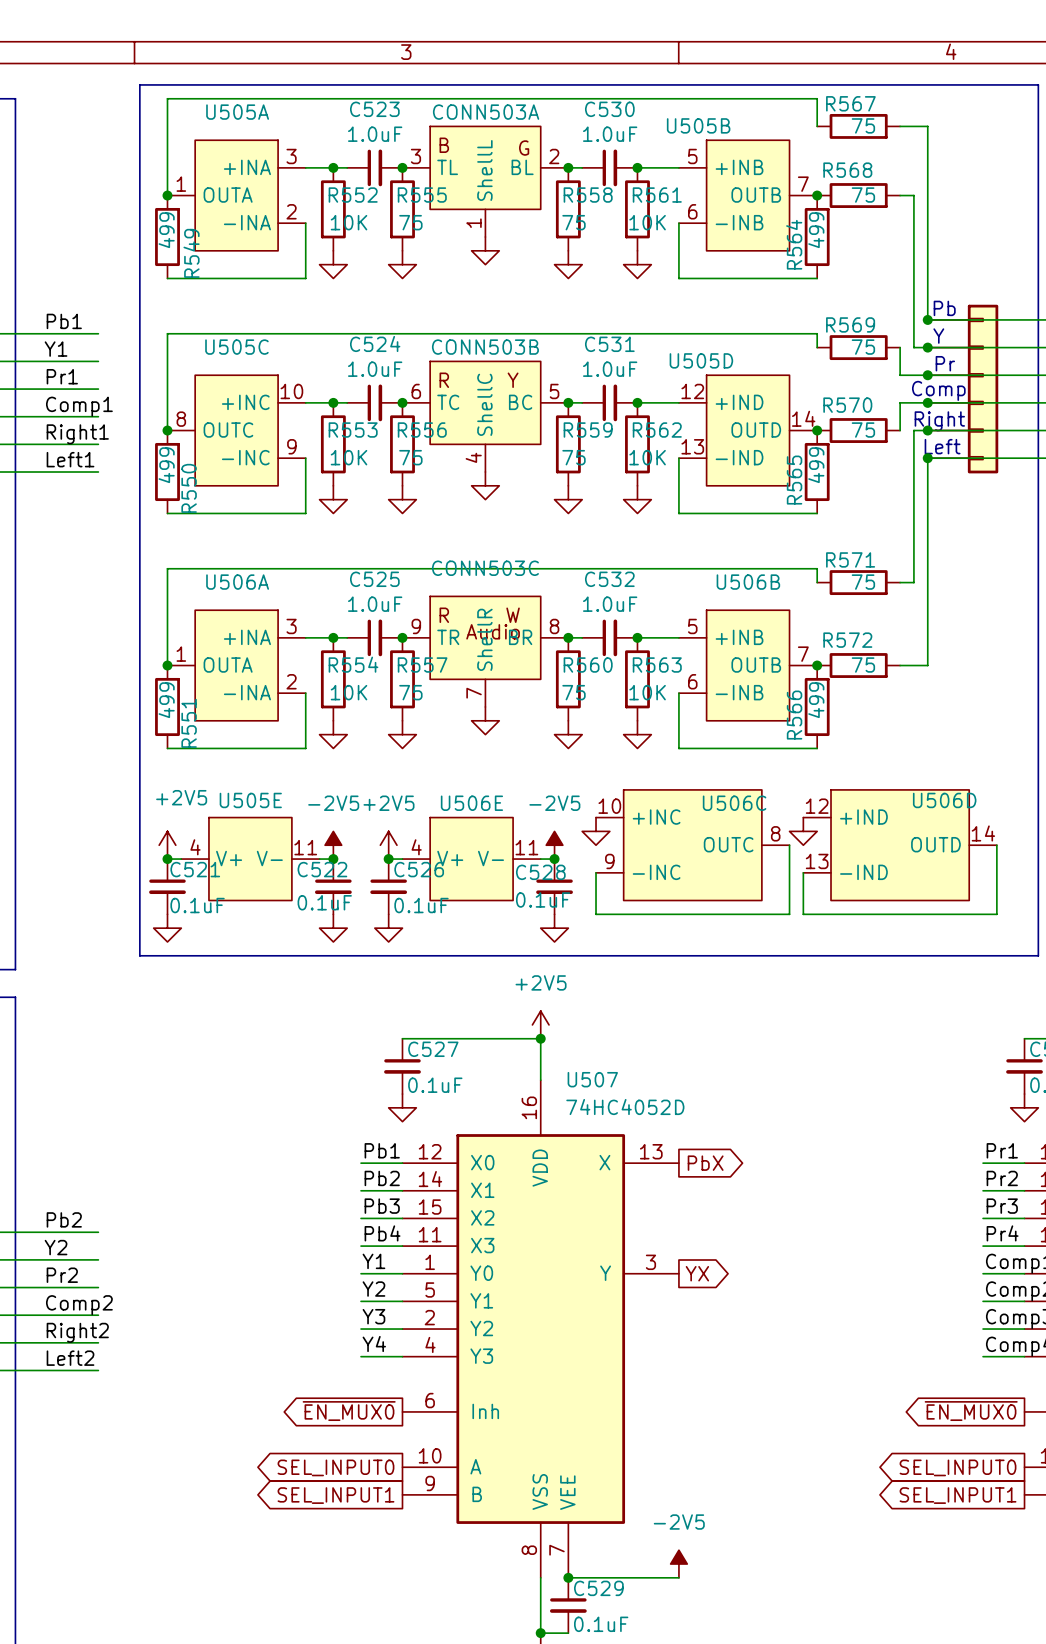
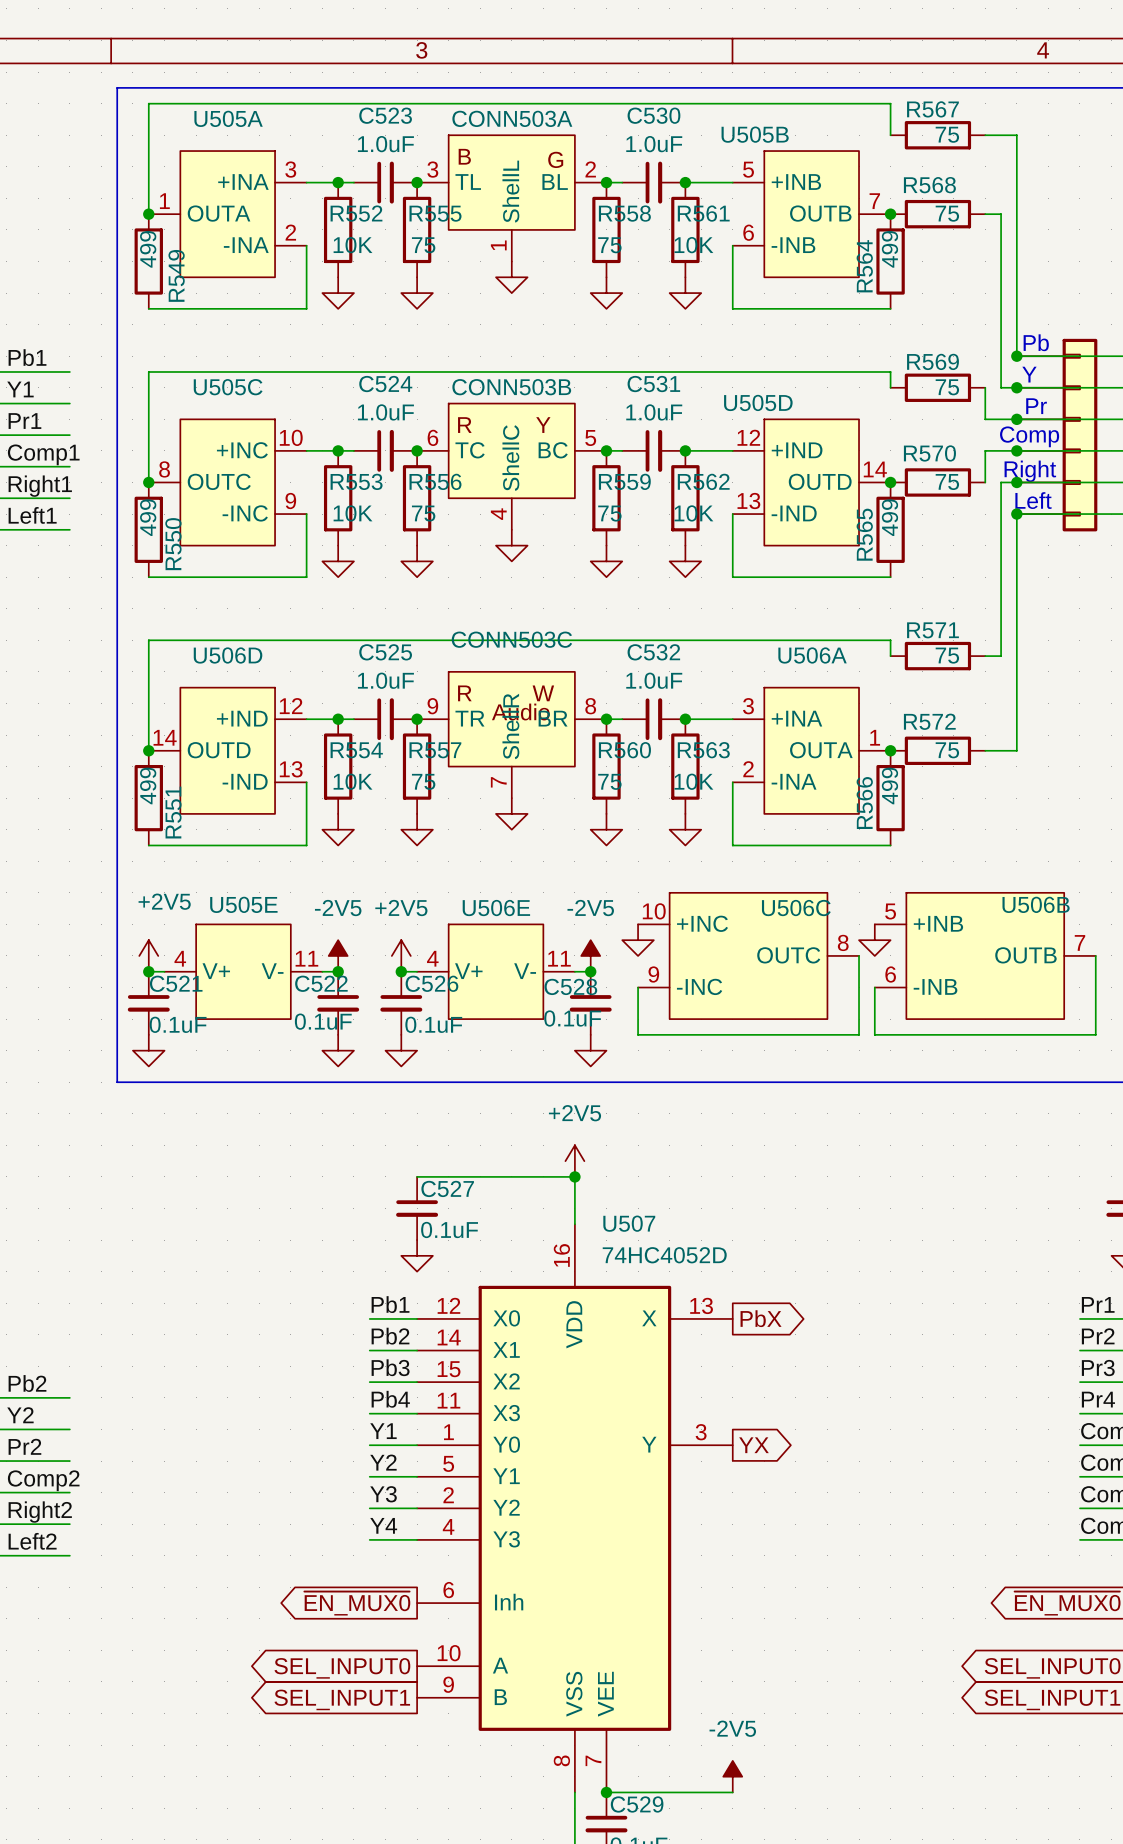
U506B name position: U506B (748, 582) -> U506B (1036, 904)
U506B symbol: [678, 610, 818, 721] -> [874, 892, 1096, 1020]
U506A flip: as is (236, 665) -> left-right (811, 750)
U506A position: (236, 665) -> (811, 750)
U506D symbol: [803, 789, 997, 901] -> [148, 687, 307, 814]
U506D name position: U506D (944, 800) -> U506D (228, 655)

